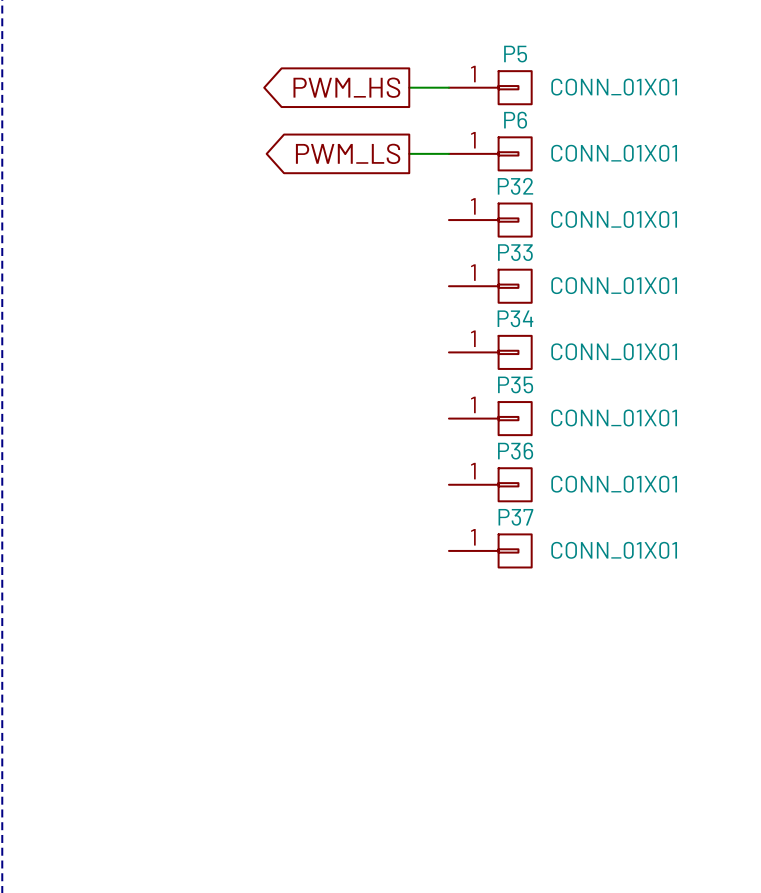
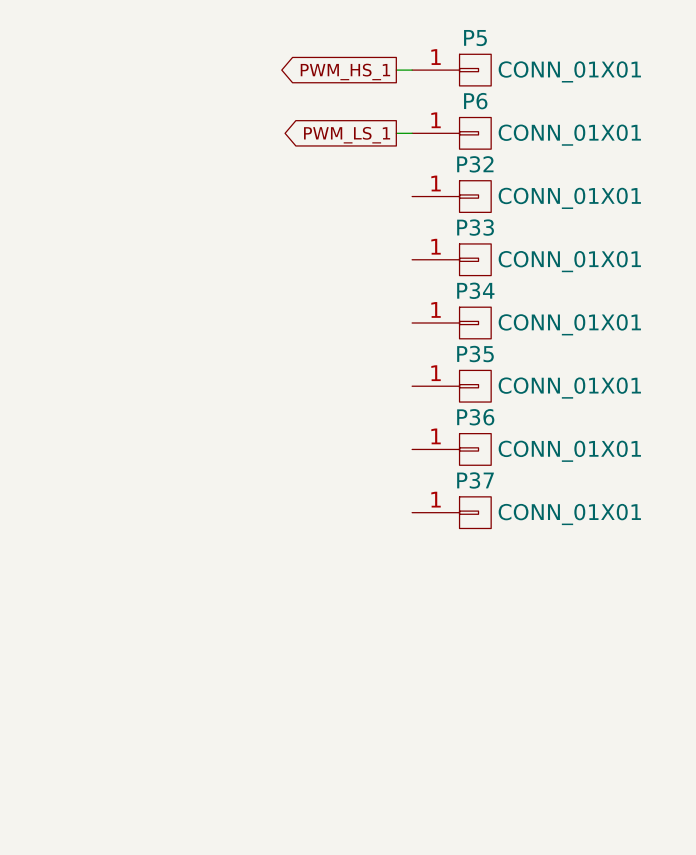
global label: PWM_HS (346, 87) -> PWM_HS_1 (345, 71)
wire: (409, 87) (432, 87) -> none
global label: PWM_LS (348, 153) -> PWM_LS_1 (347, 135)
wire: (409, 153) (432, 153) -> none

